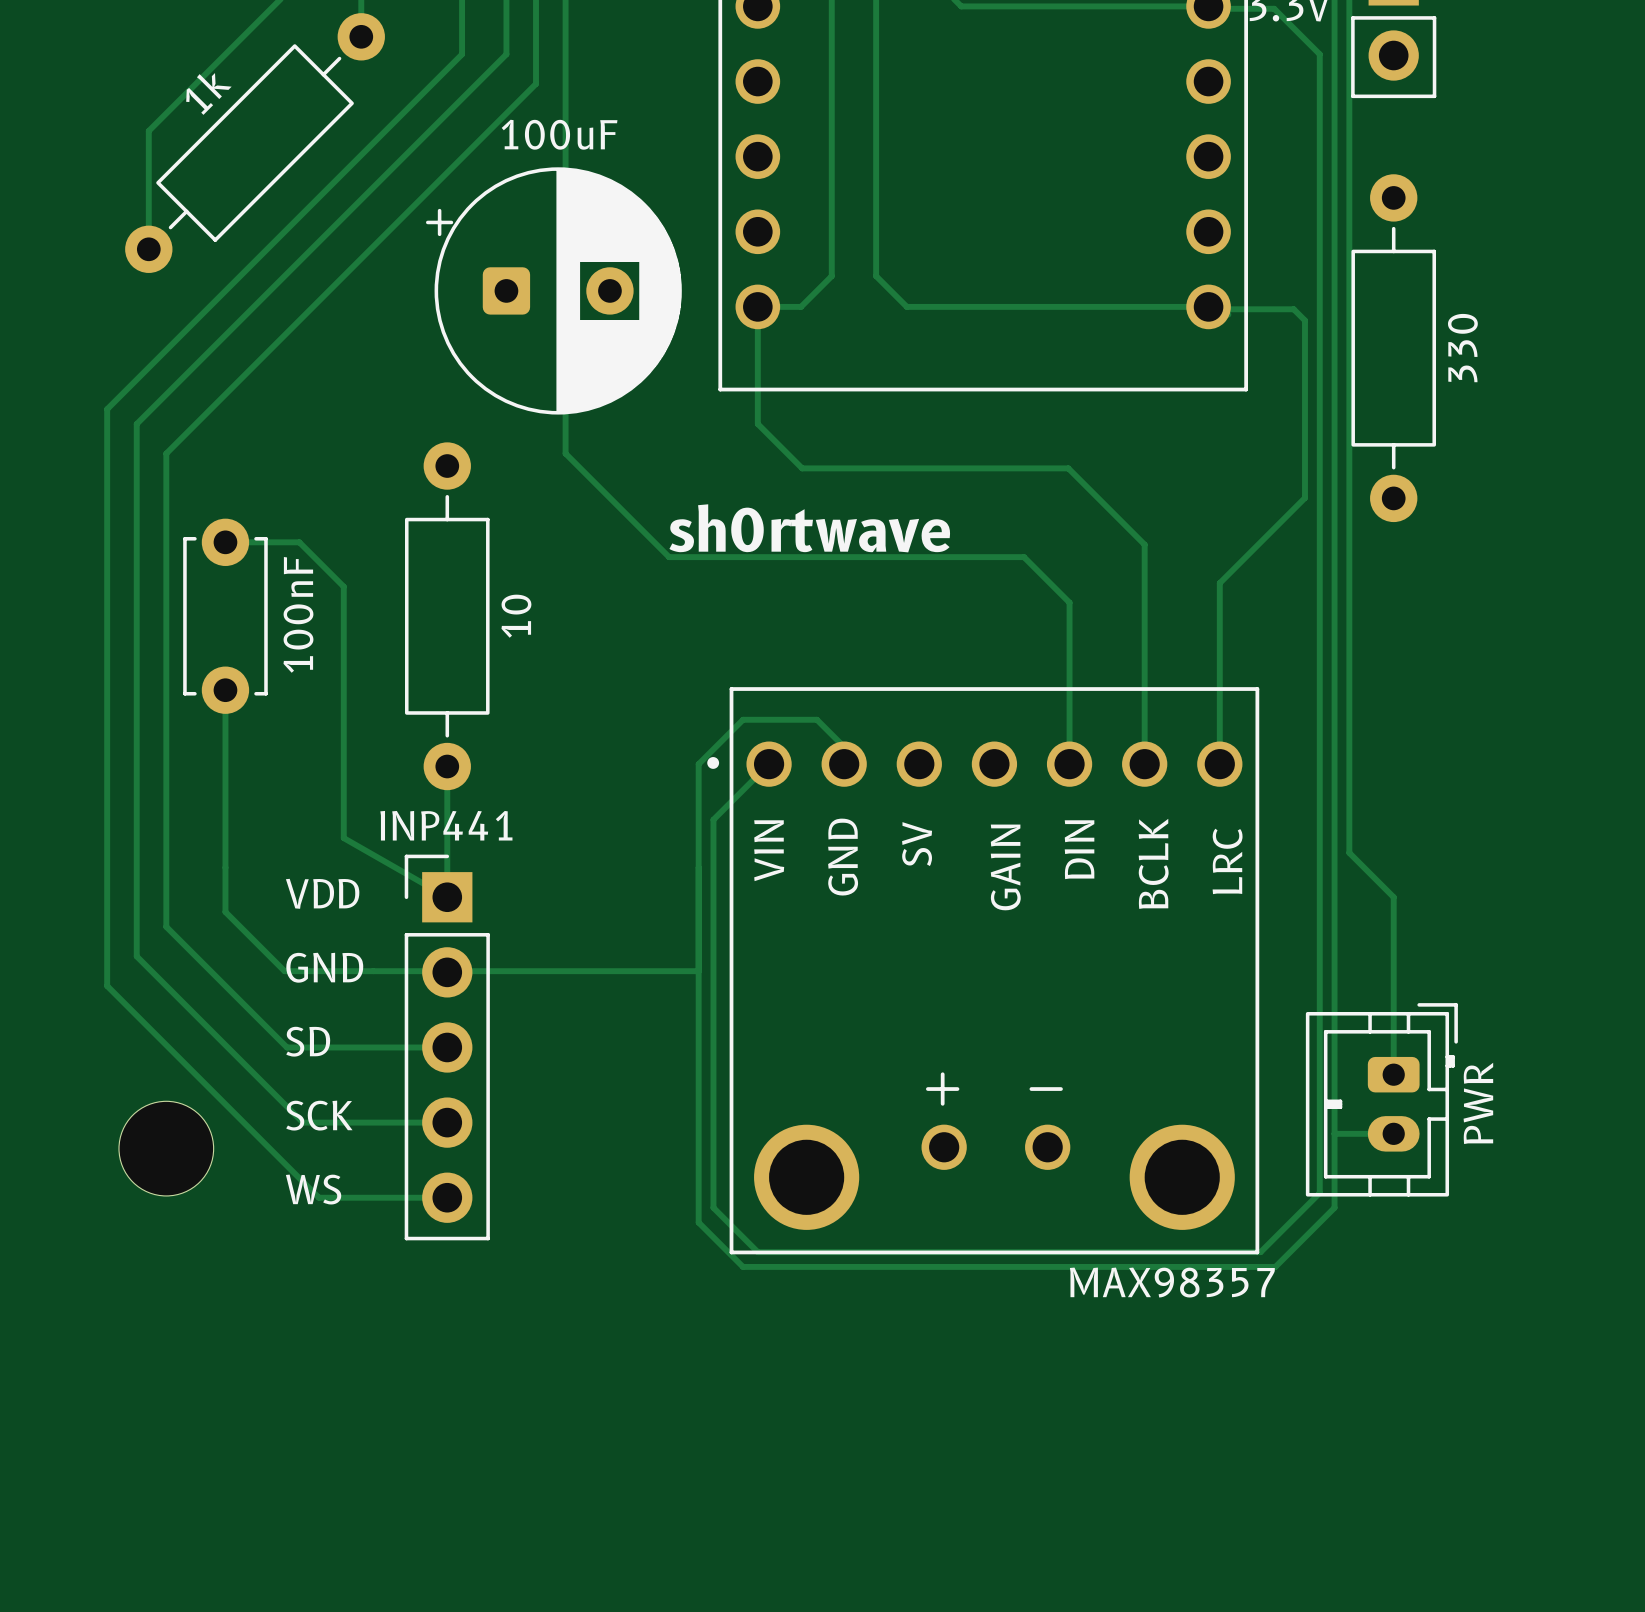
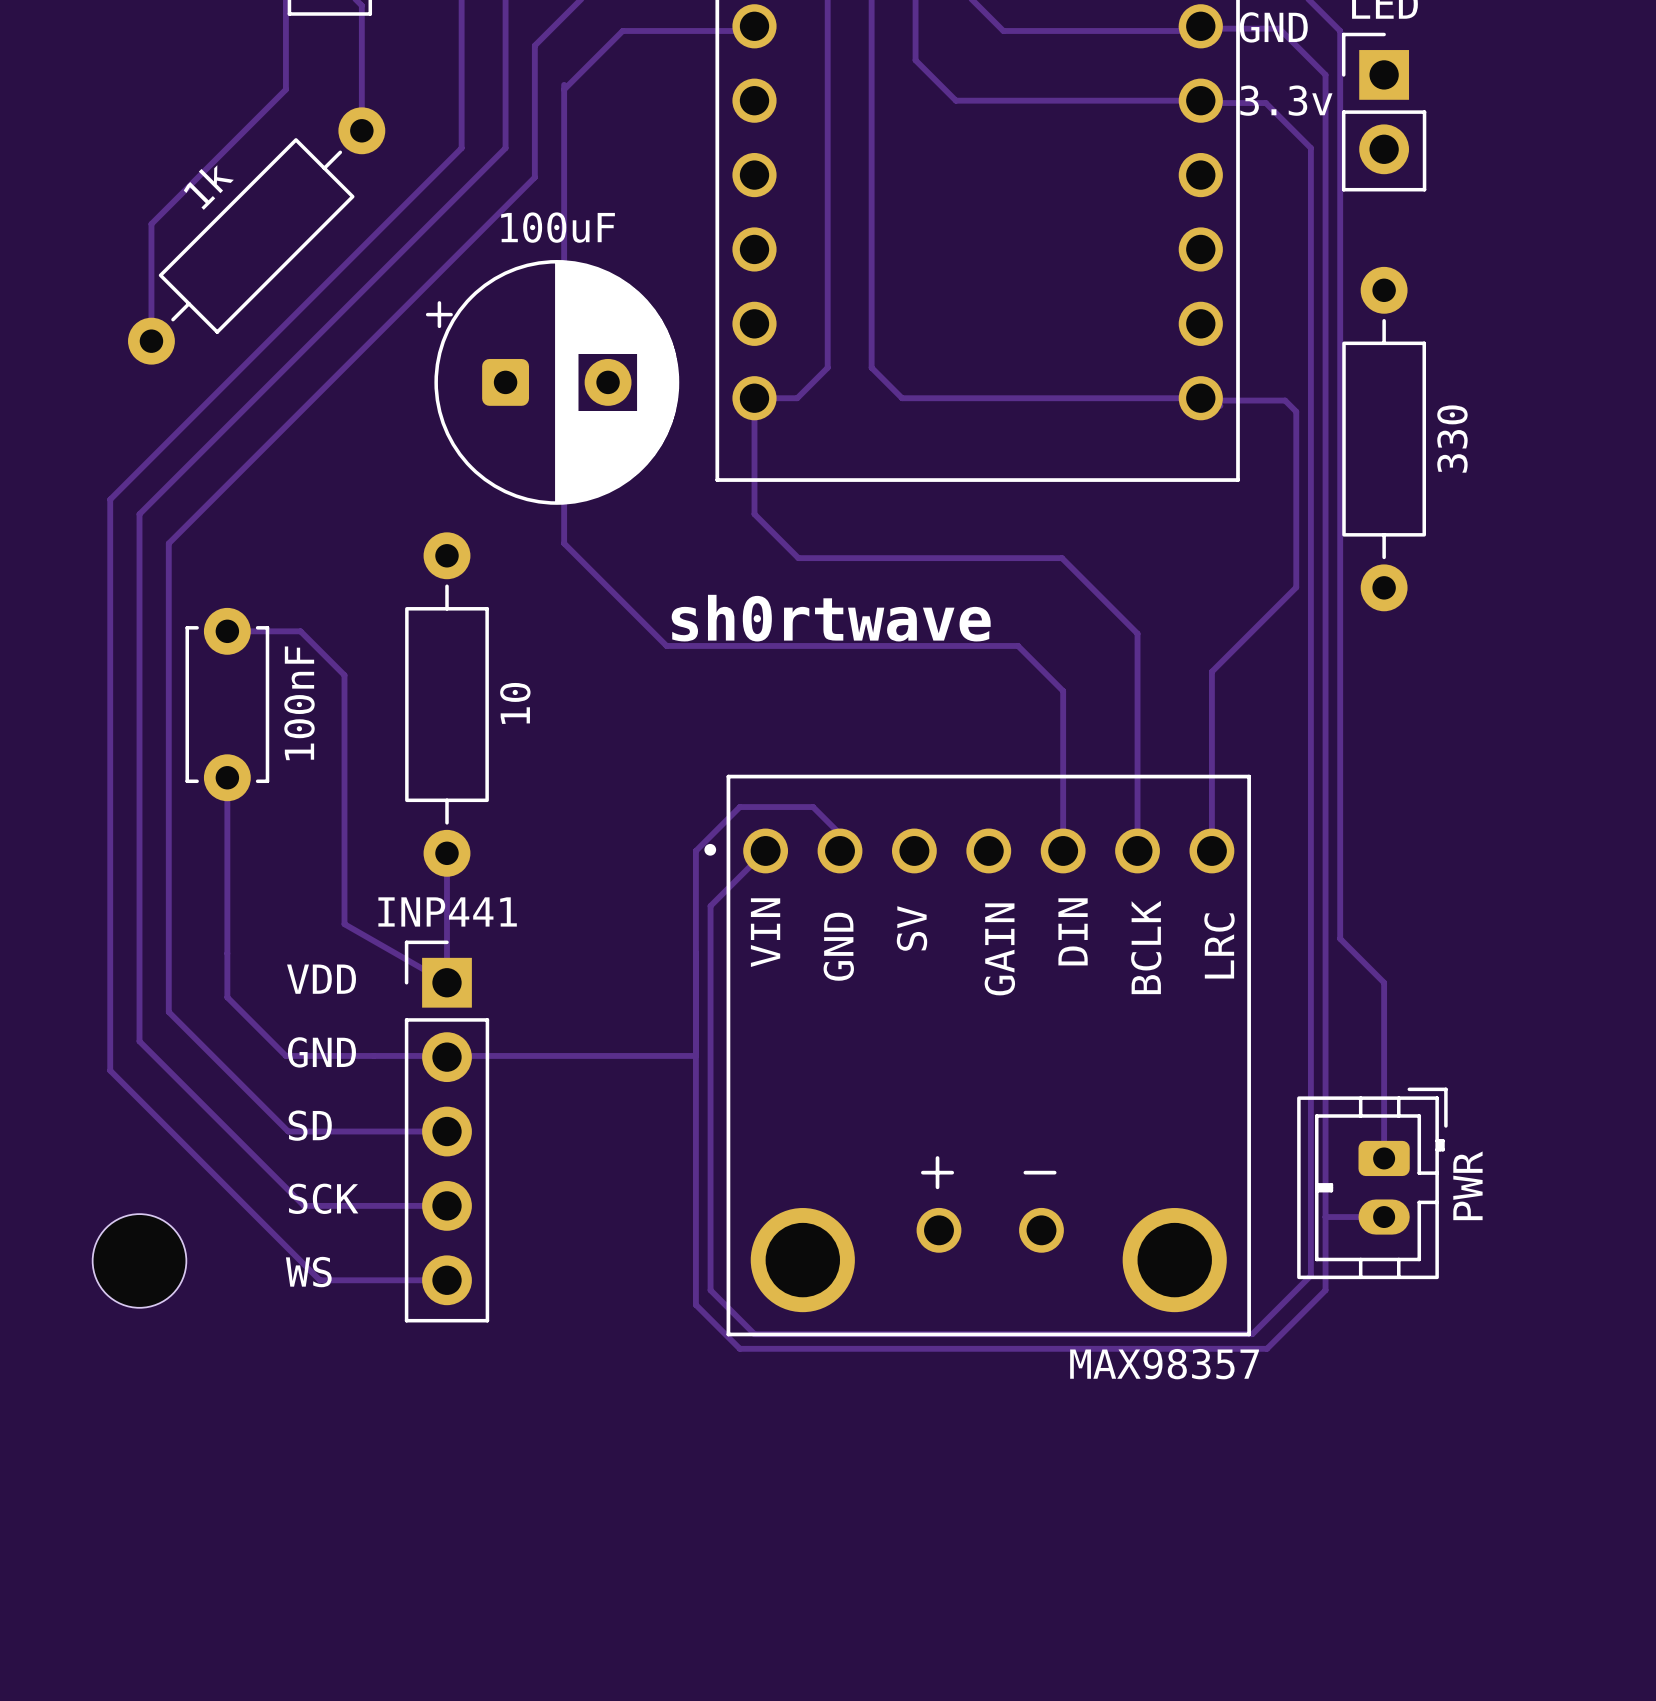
part position: (166, 1148) -> (139, 1260)

